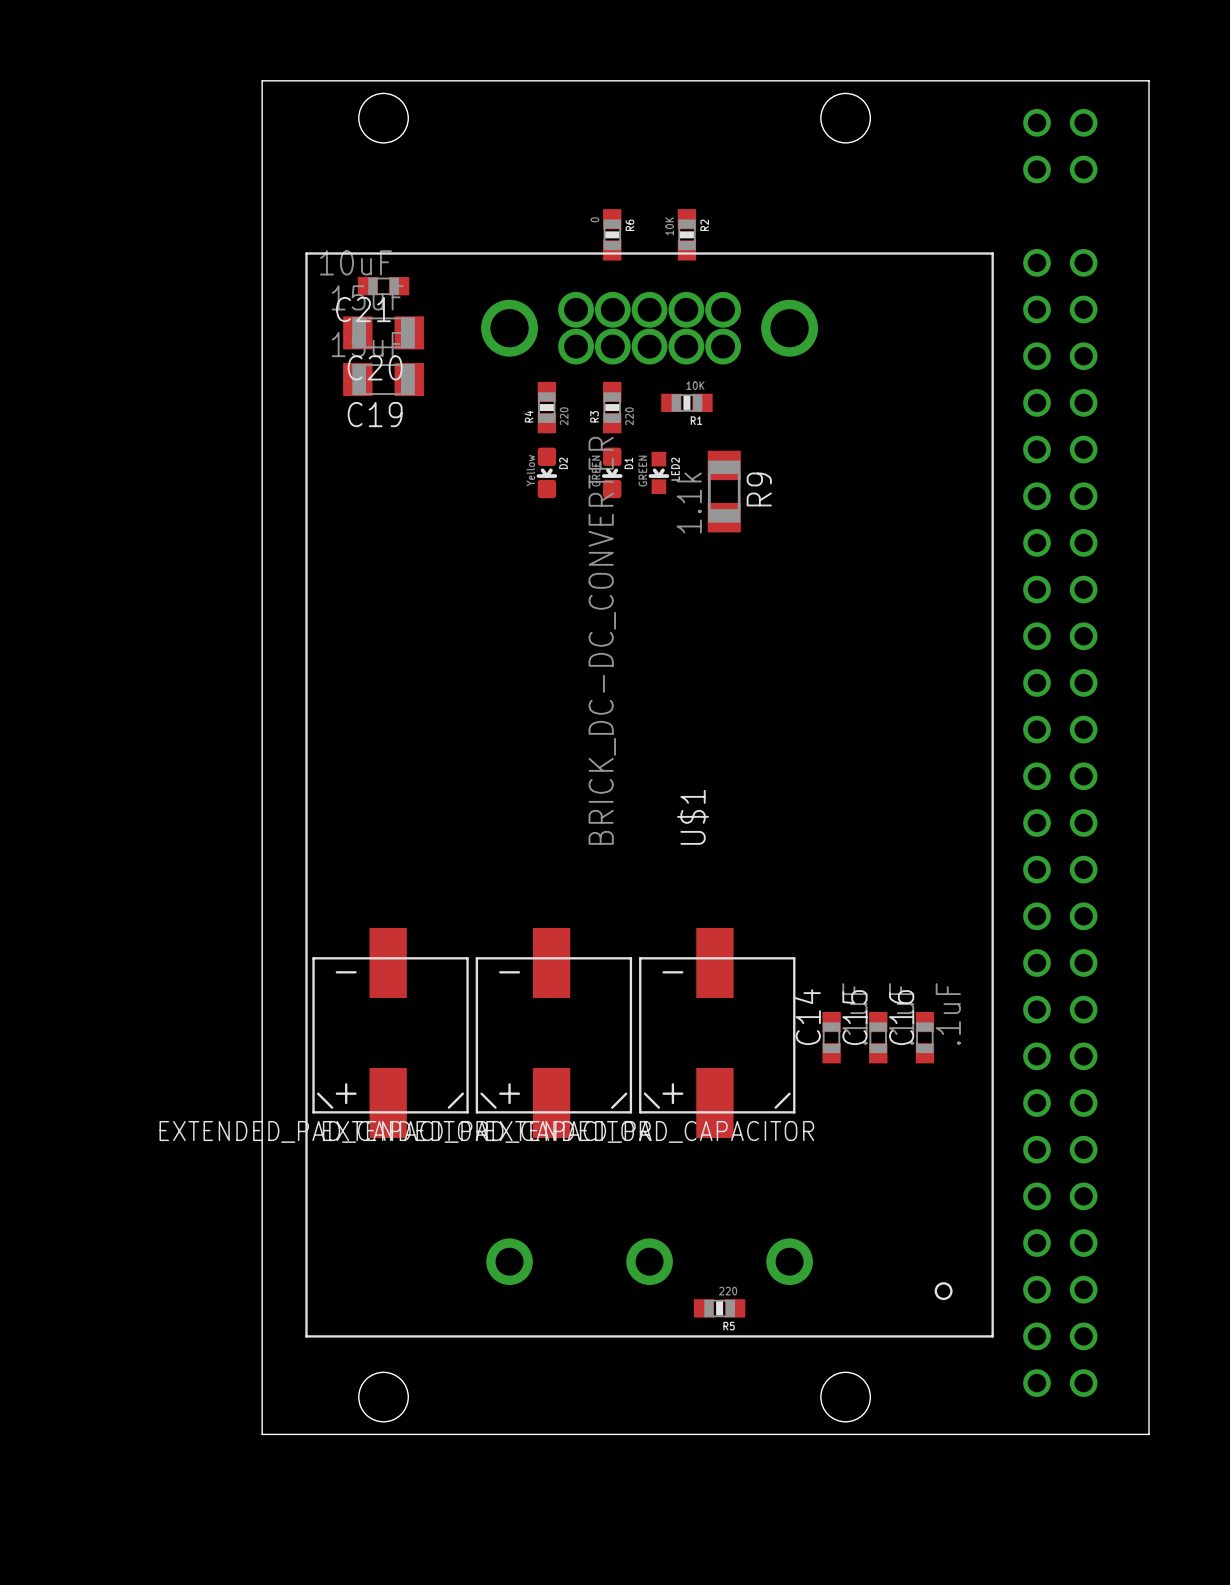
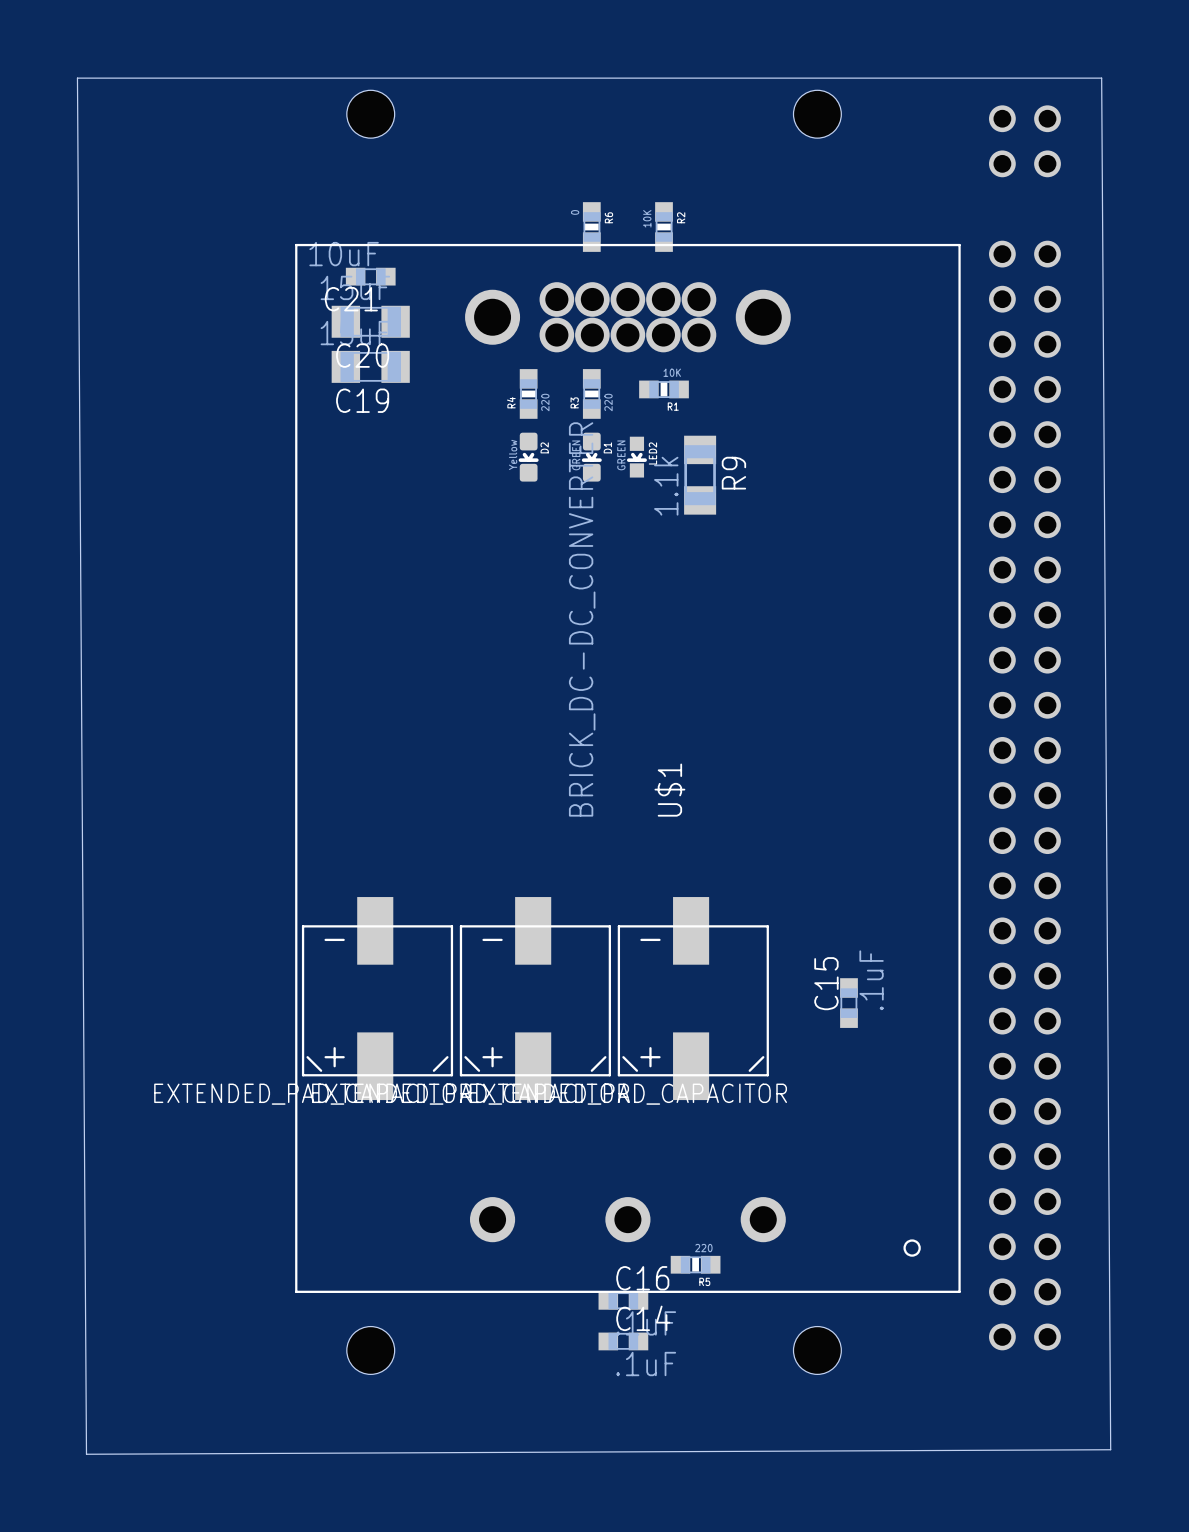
board edge: (262, 80) (262, 1434) (1149, 1434) (1149, 80) (1139, 80) -> (253, 78) (77, 78) (86, 1454) (1110, 1449) (1101, 78)
C14 rotation: 0° (831, 1037) -> 90° clockwise (623, 1341)
C14 position: (831, 1037) -> (623, 1341)
C16 rotation: 0° (924, 1037) -> 90° clockwise (623, 1300)
C16 position: (924, 1037) -> (623, 1300)

